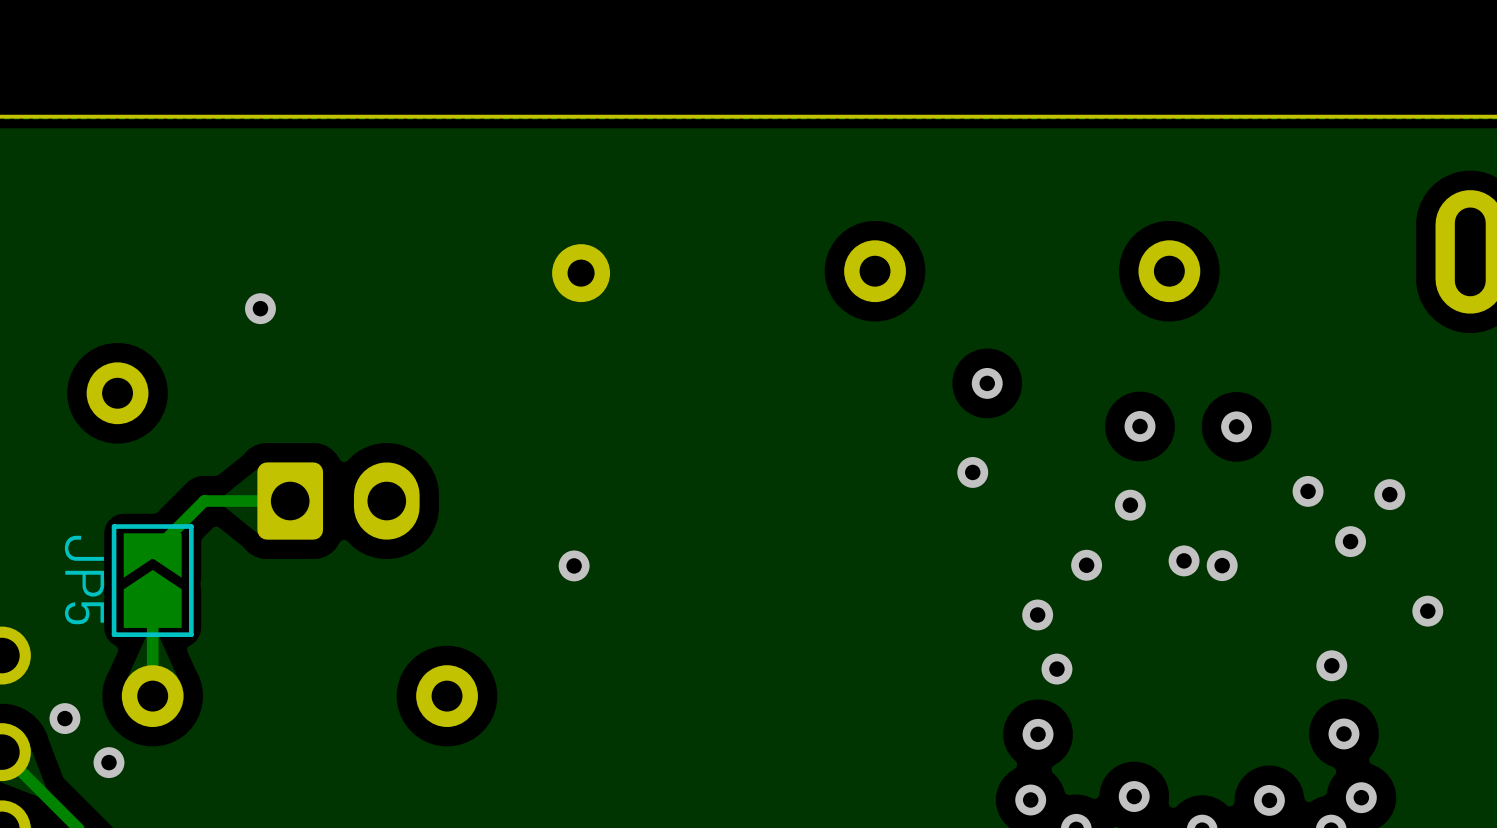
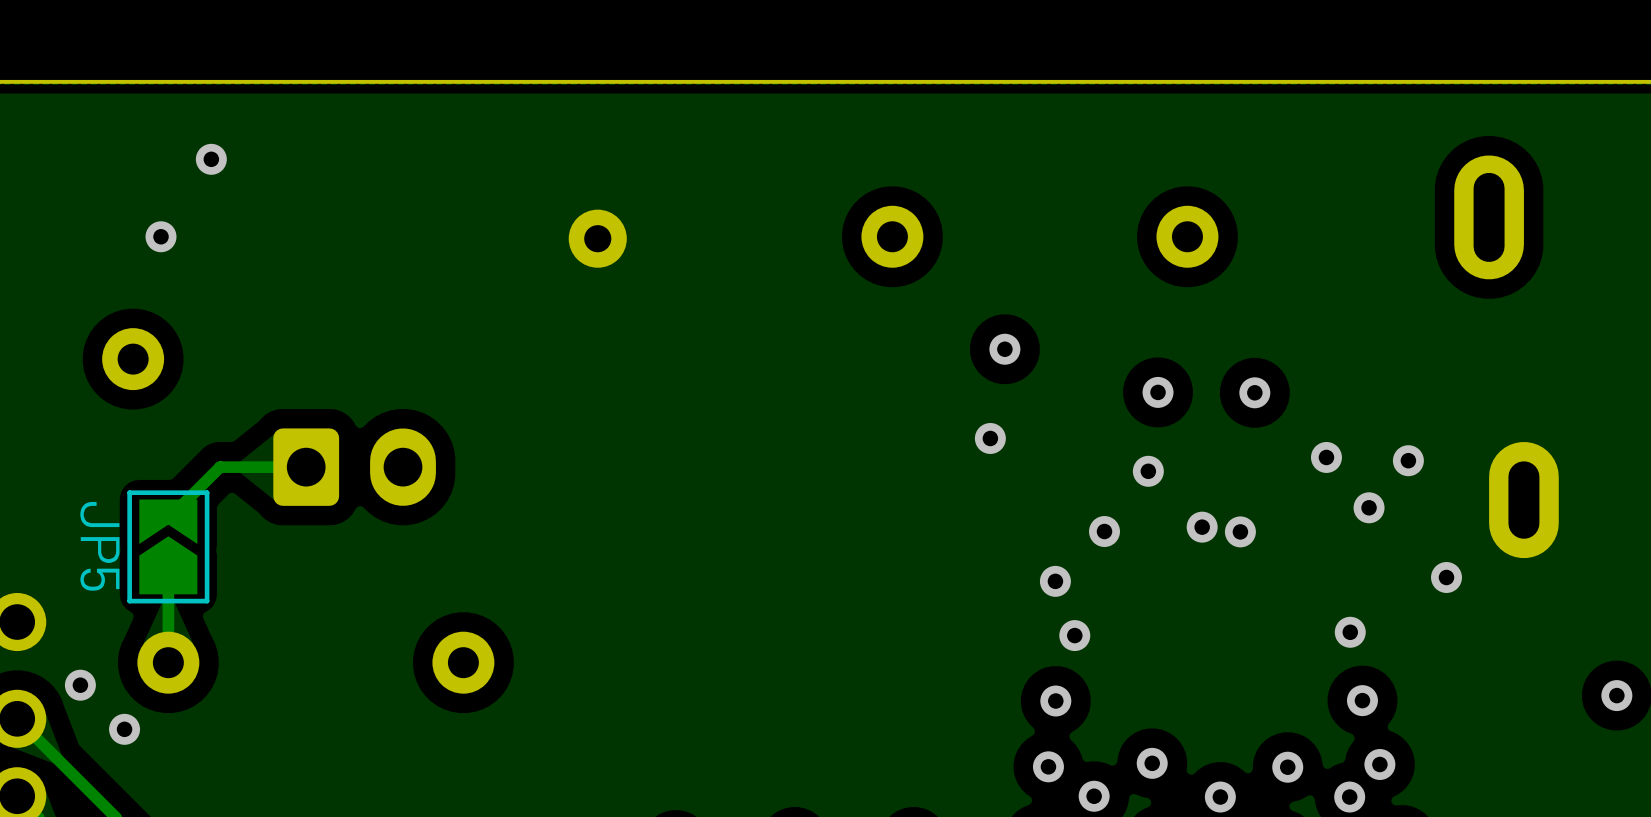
via: none -> (211, 159)
via: none -> (161, 236)
via: (260, 308) -> none
via: (574, 565) -> none

